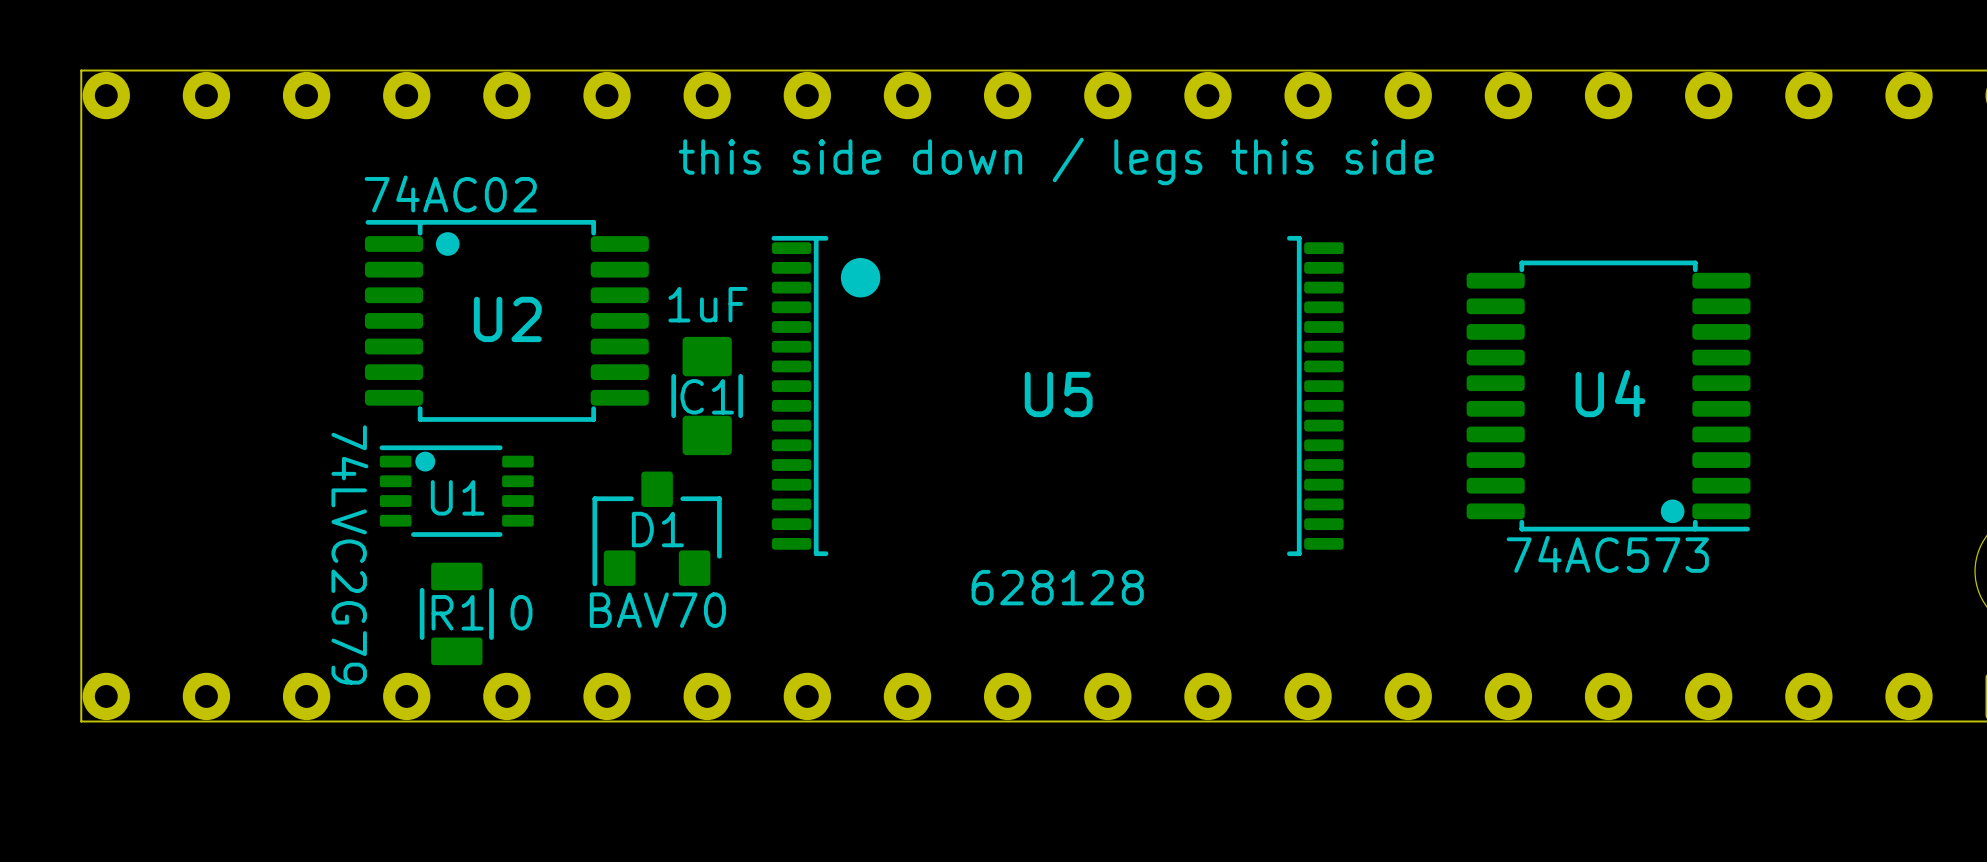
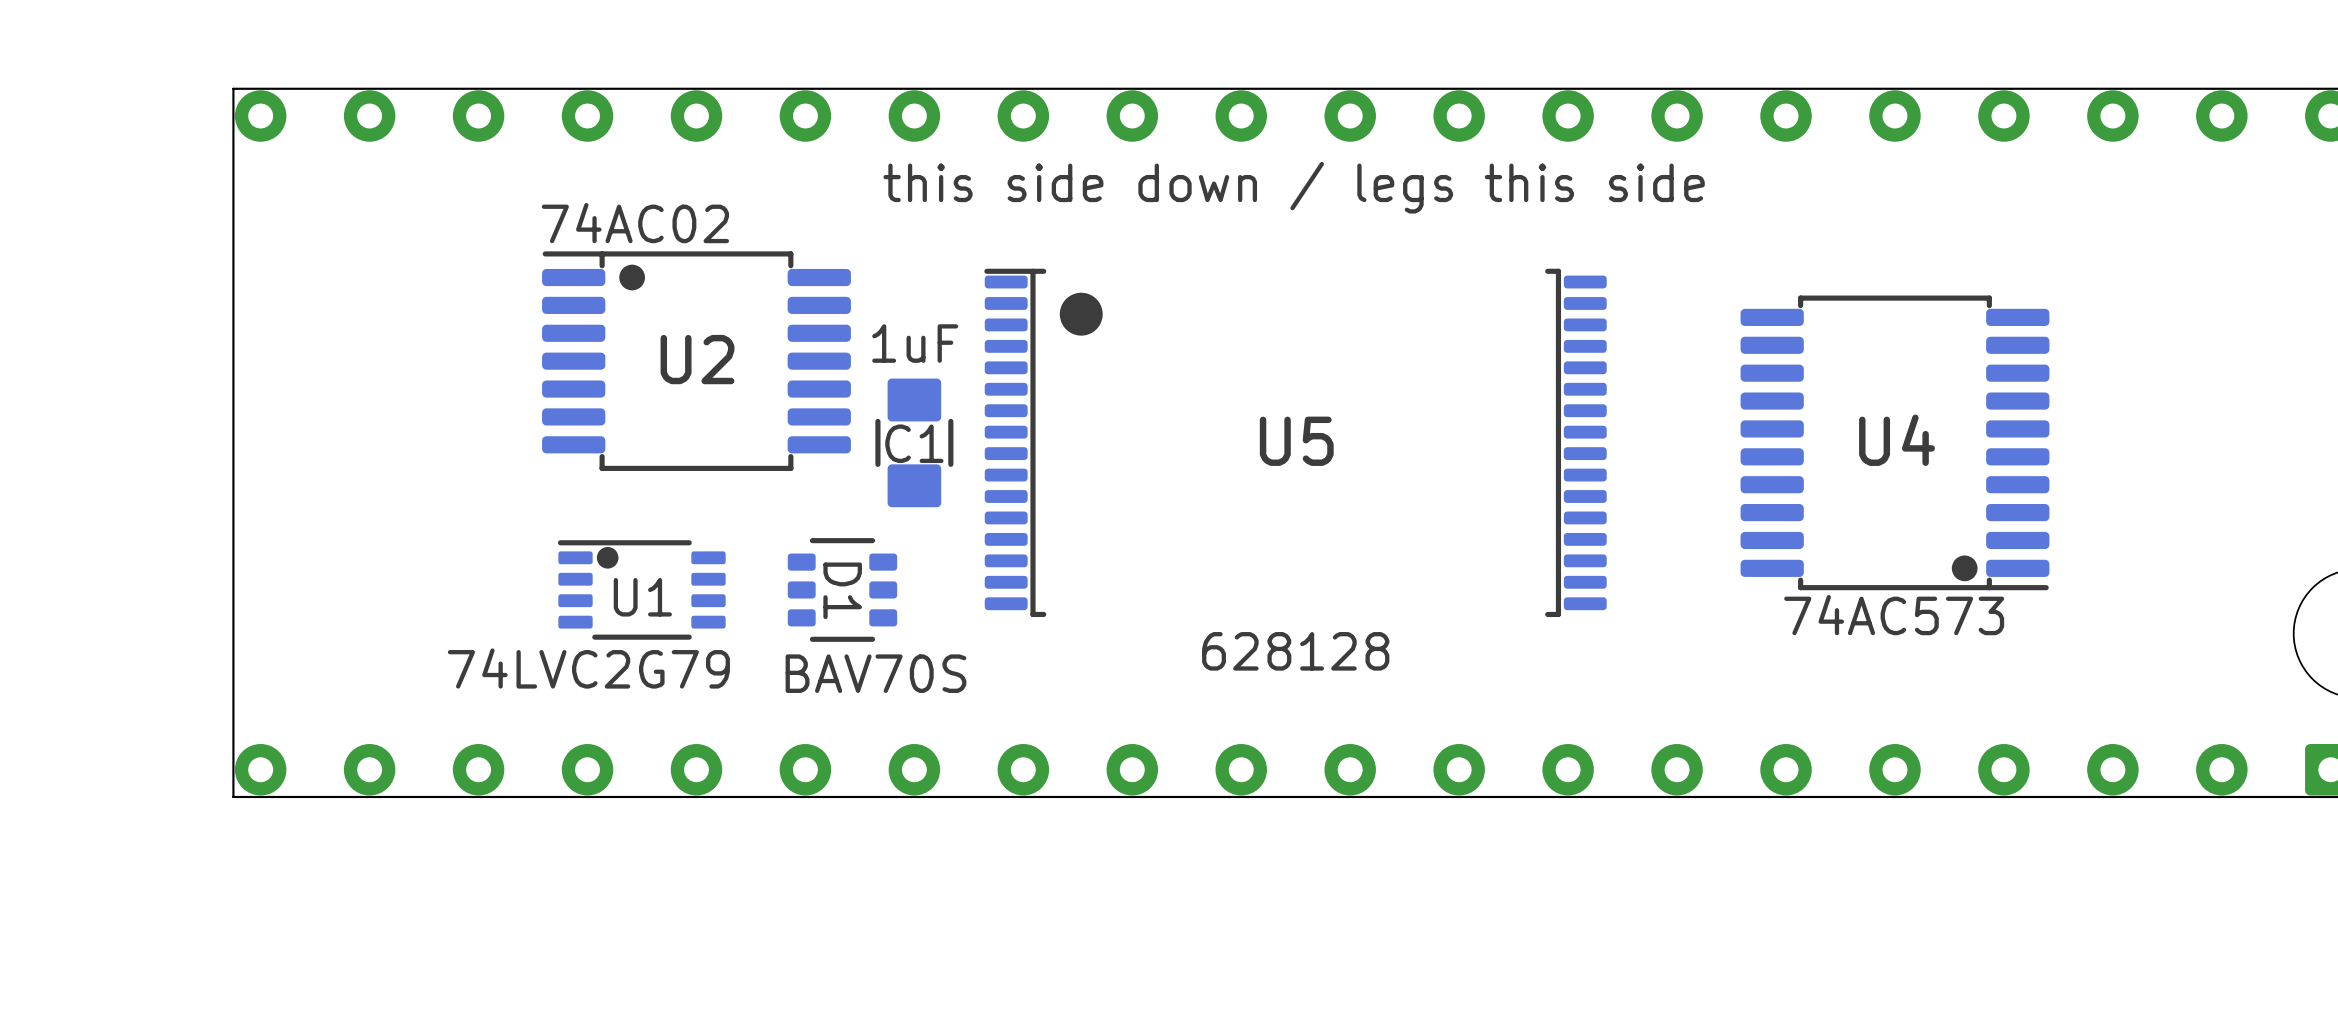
D1 footprint: [592, 471, 722, 587] -> [787, 538, 898, 642]
U1 position: (456, 491) -> (641, 589)
U1 value rotation: 0° (349, 554) -> 90° counterclockwise (588, 668)
D1 value: BAV70 (657, 610) -> BAV70S (875, 673)
R1: 0 (456, 613) -> none

